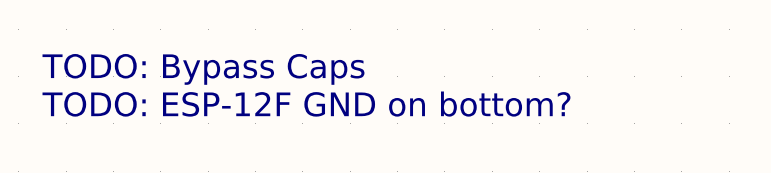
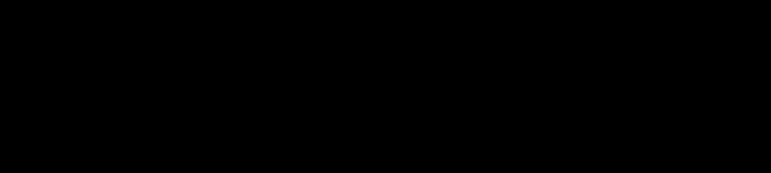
text: TODO: Bypass Caps (203, 69) -> none
text: TODO: ESP-12F GND on bottom? (306, 104) -> none

